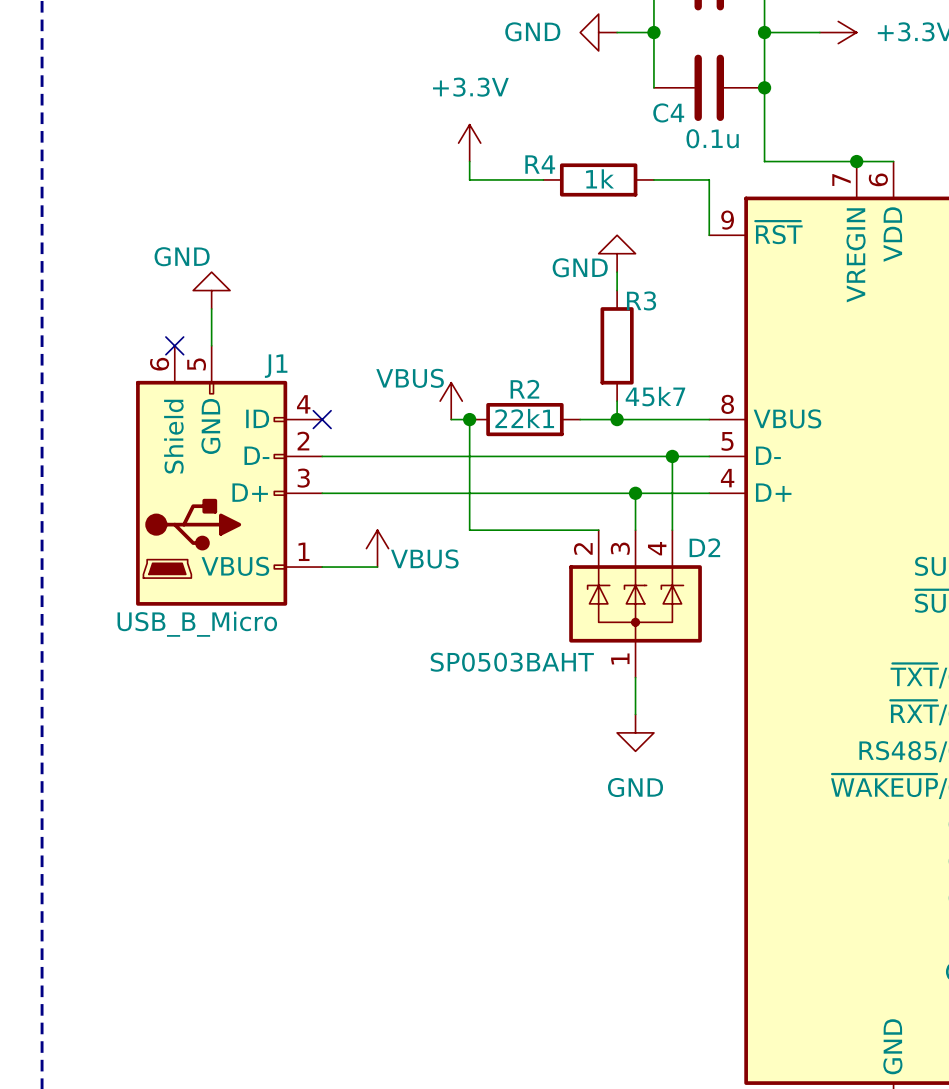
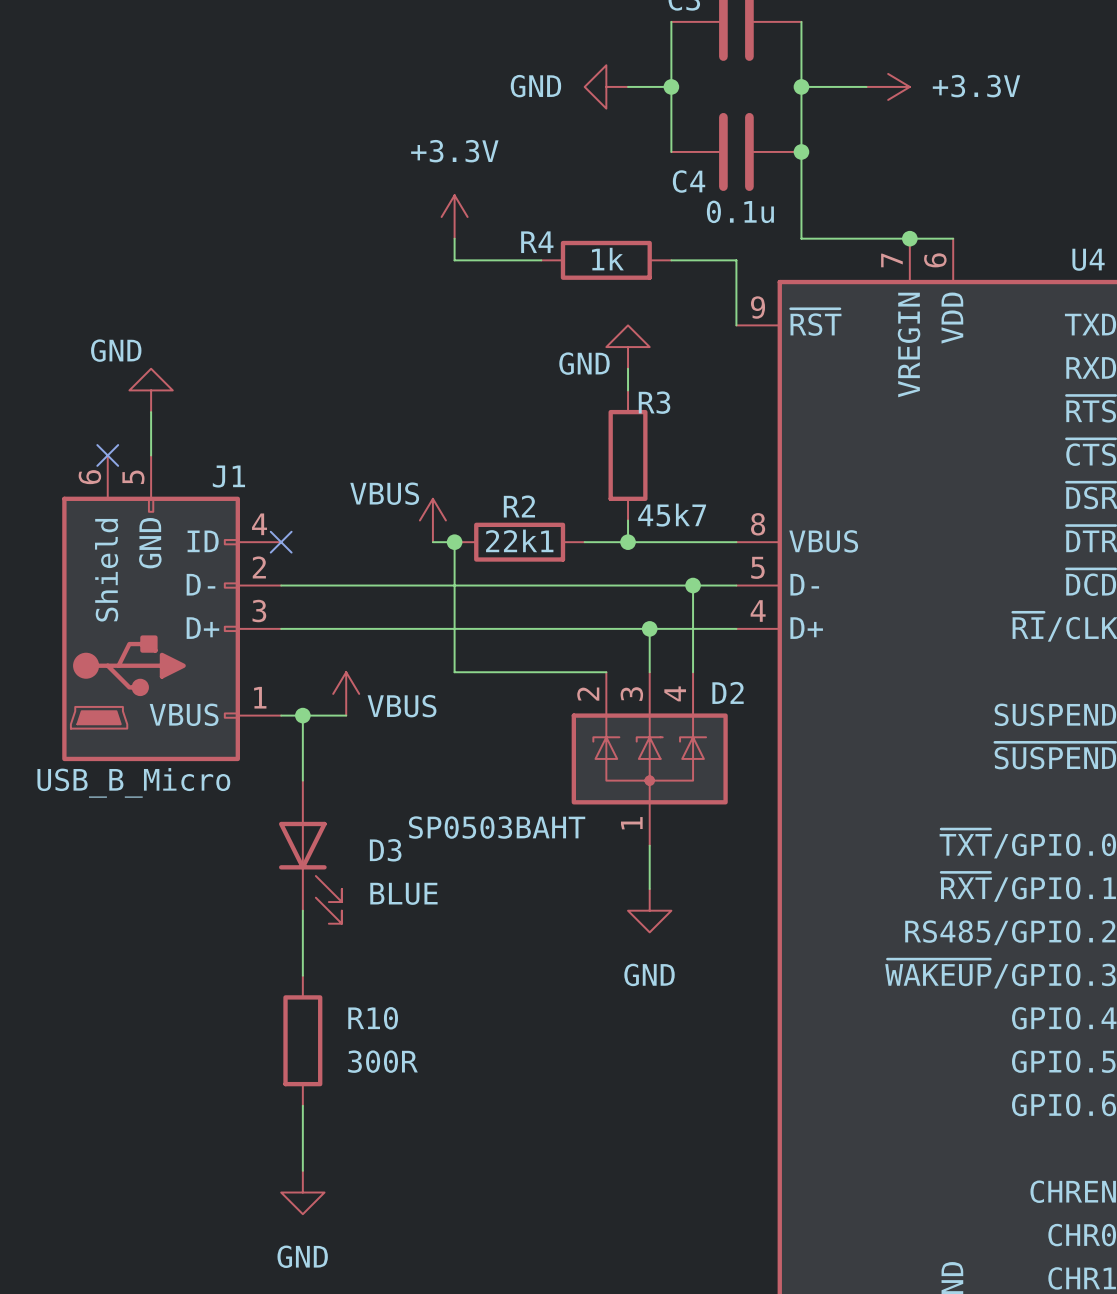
wire: none -> (302, 715) (302, 780)
junction: none -> (302, 715)
D3: none -> BLUE (310, 852)
wire: none -> (302, 910) (302, 975)
R10: none -> 300R (302, 1040)
wire: none -> (302, 1105) (302, 1170)
power symbol: none -> GND (302, 1192)

